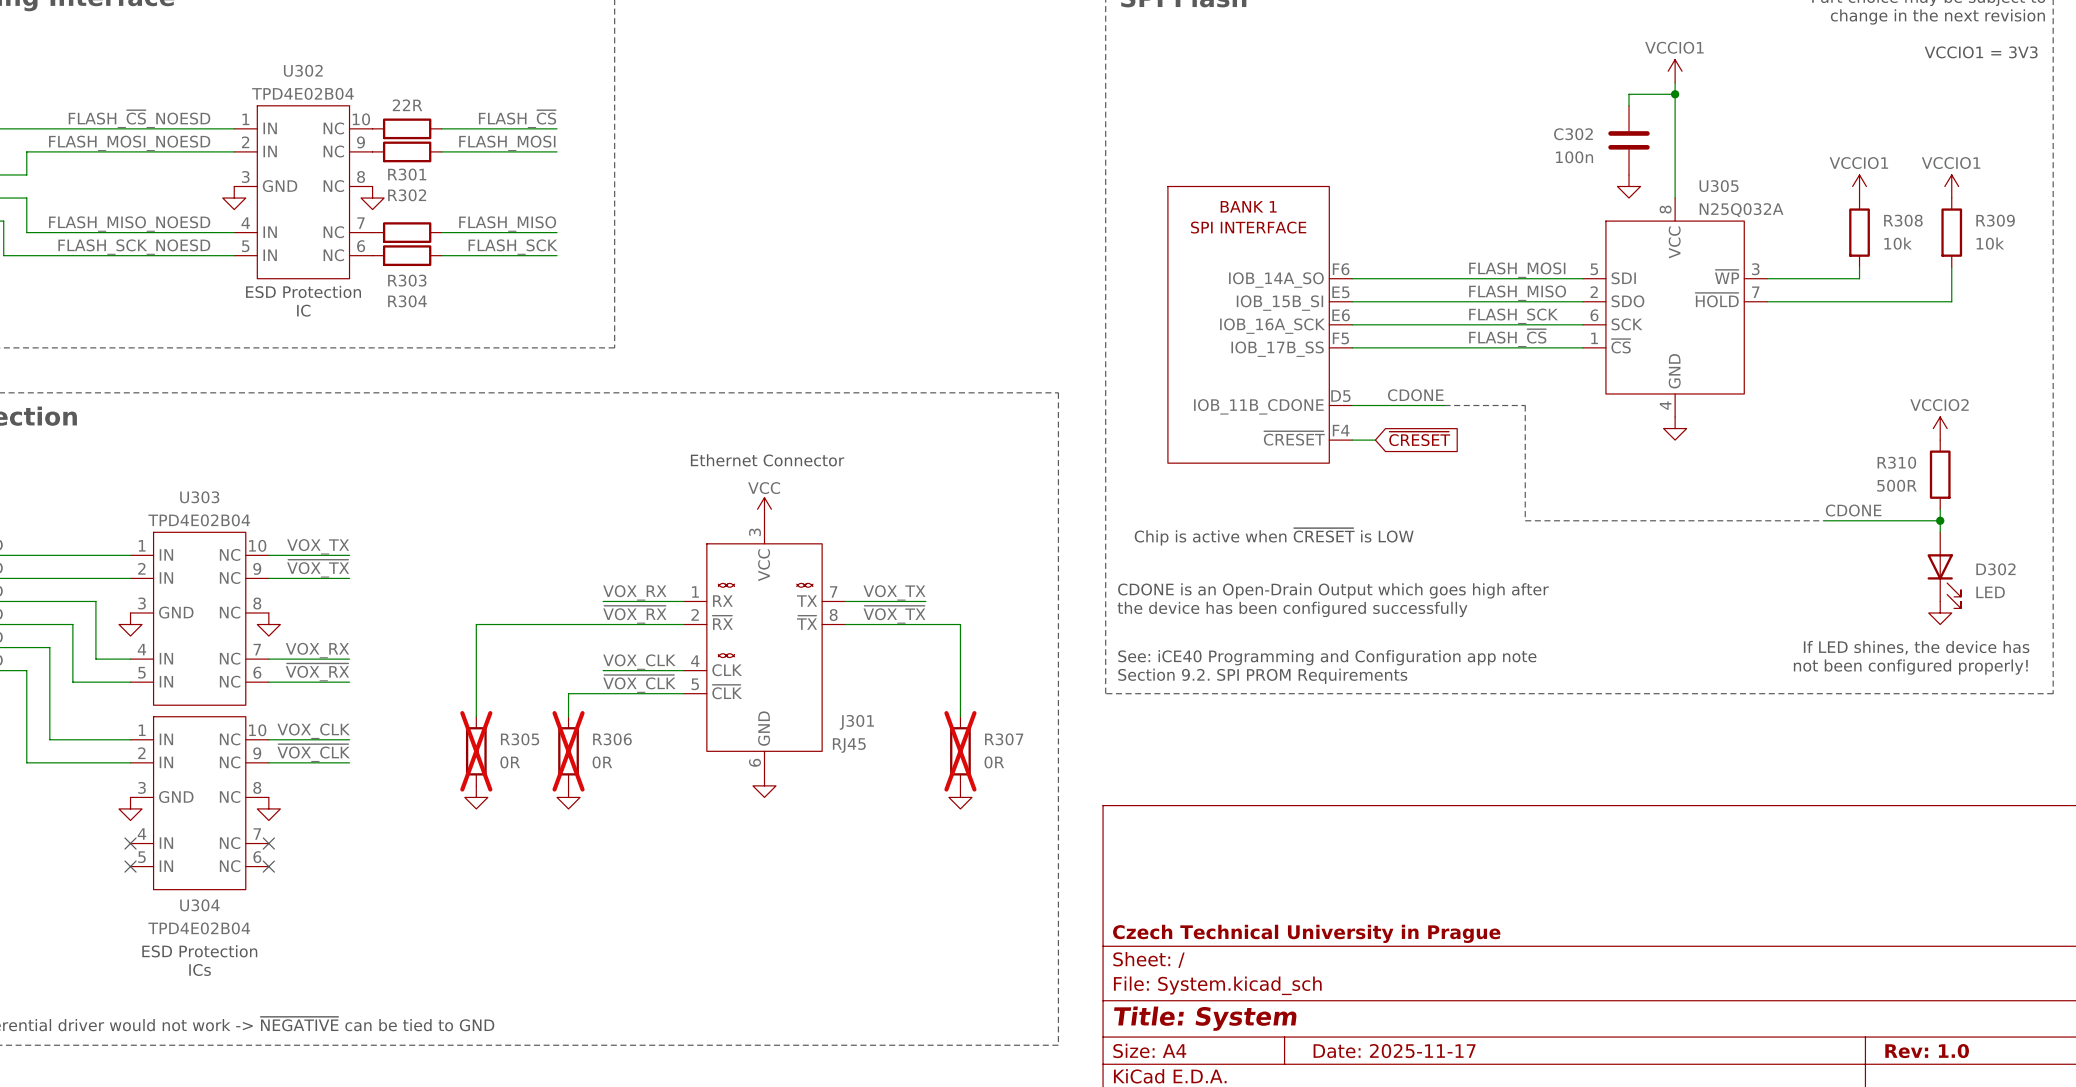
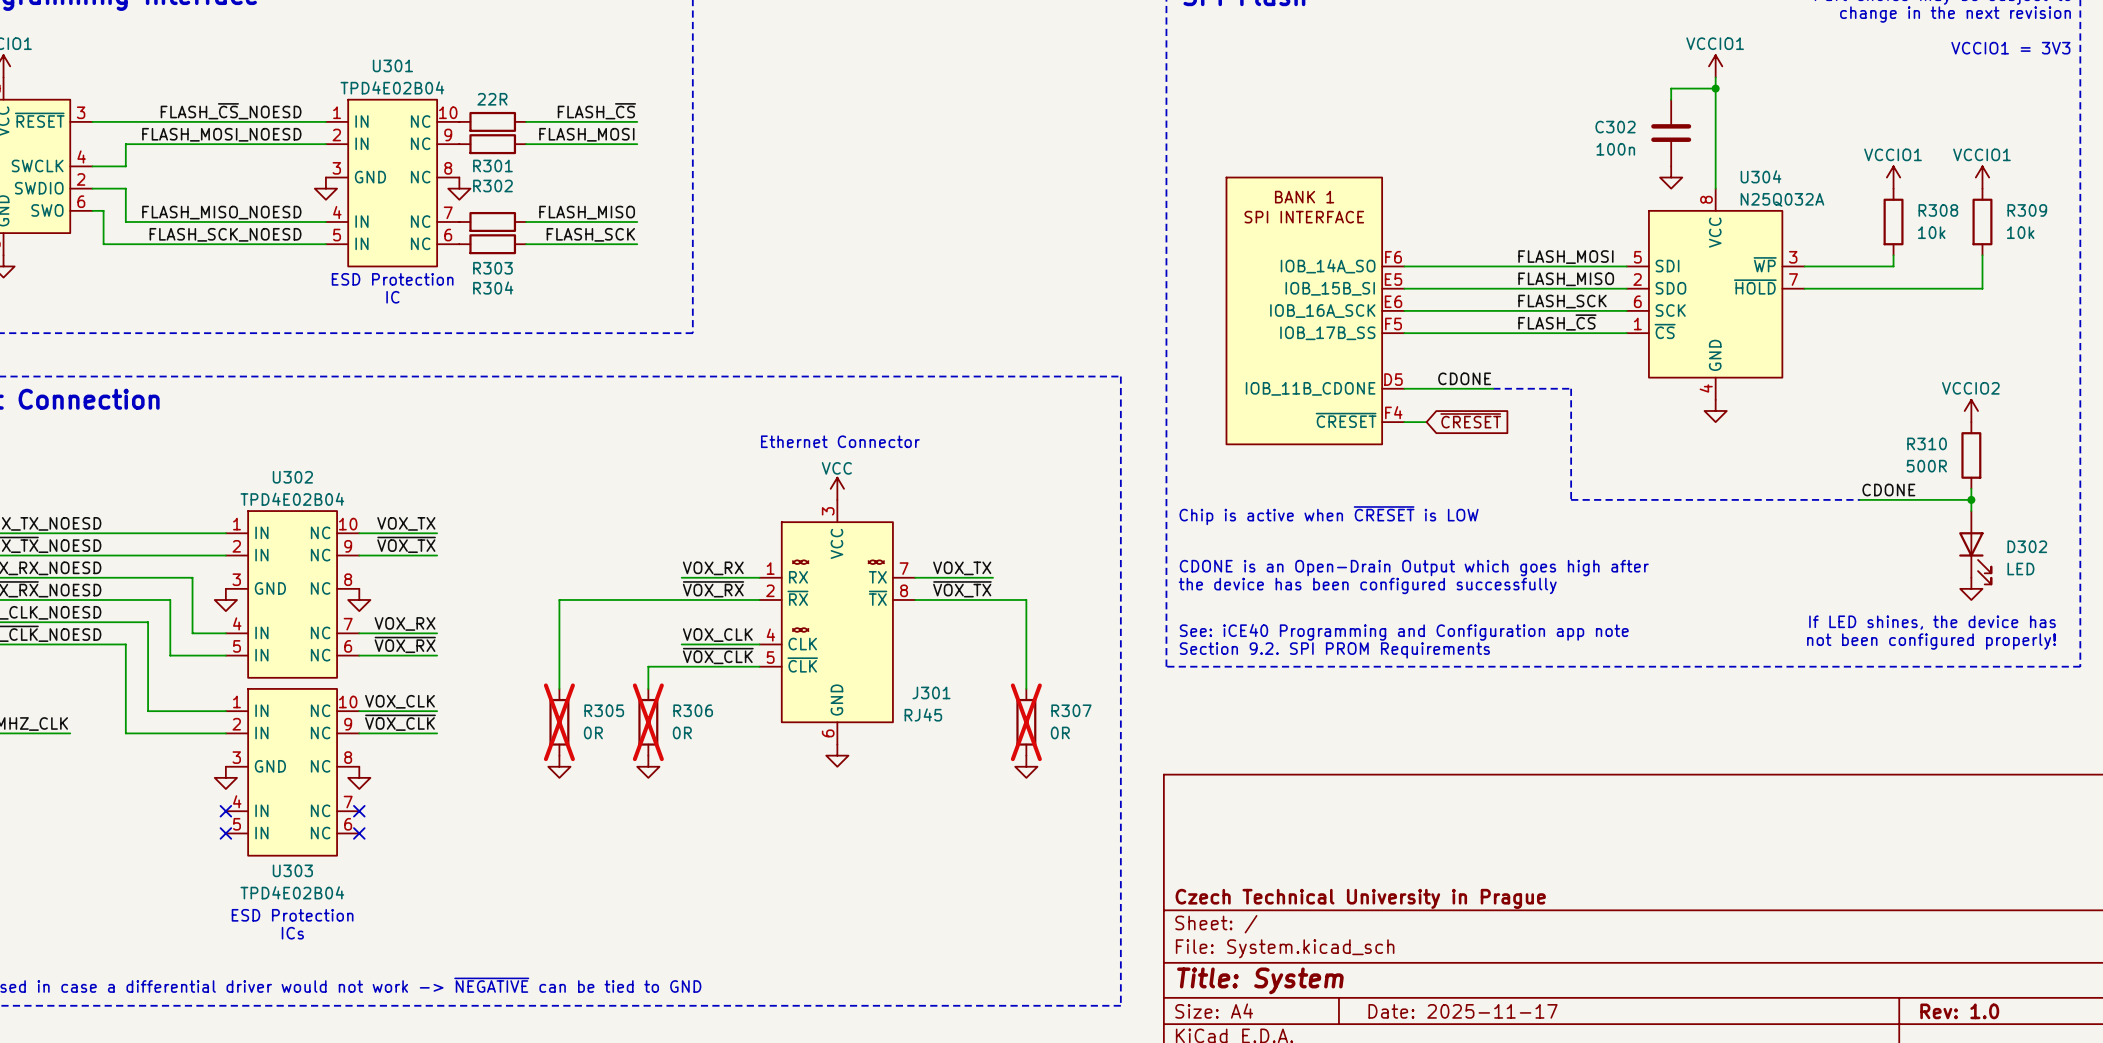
U302 name: U302 (303, 70) -> U301 (392, 65)
U305 name: U305 (1719, 186) -> U304 (1761, 176)
U303 name: U303 (199, 497) -> U302 (292, 477)
U304 name: U304 (199, 905) -> U303 (292, 870)

